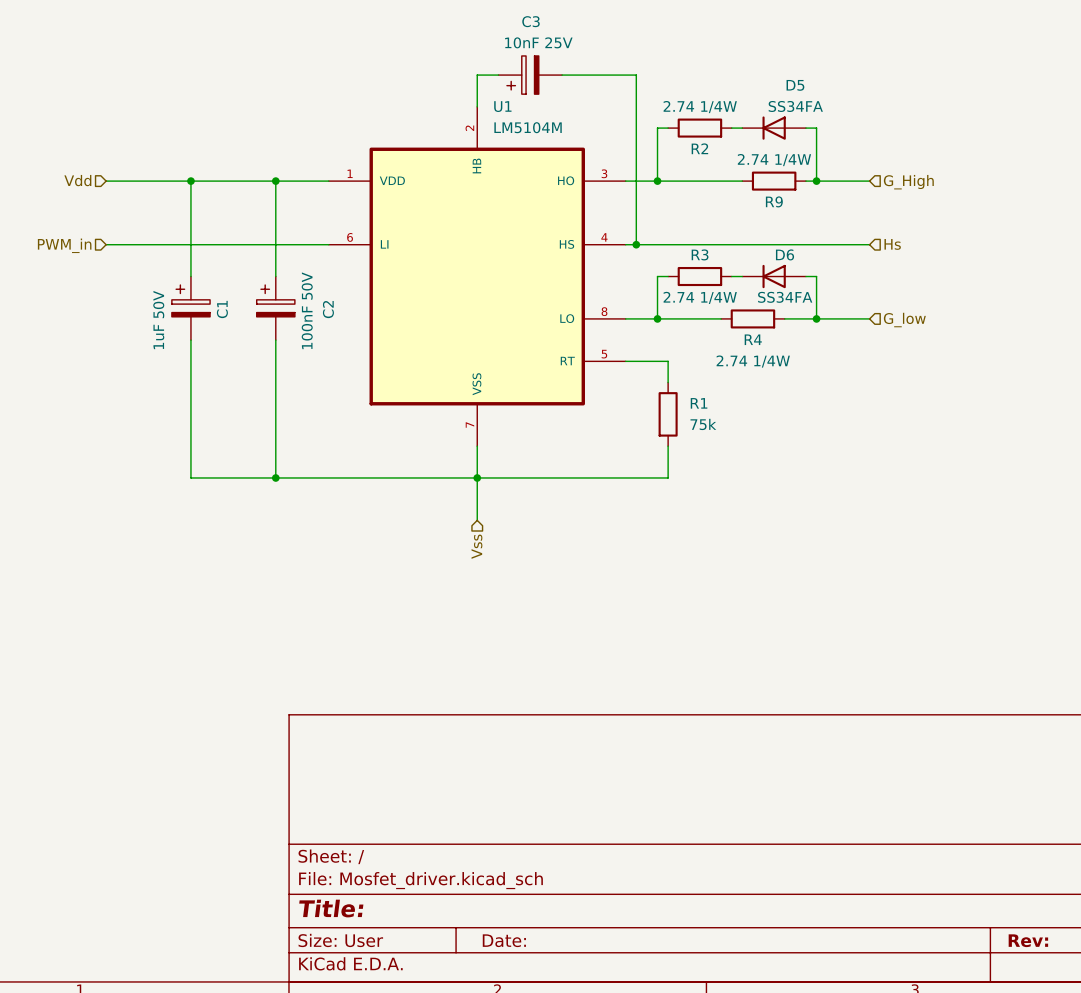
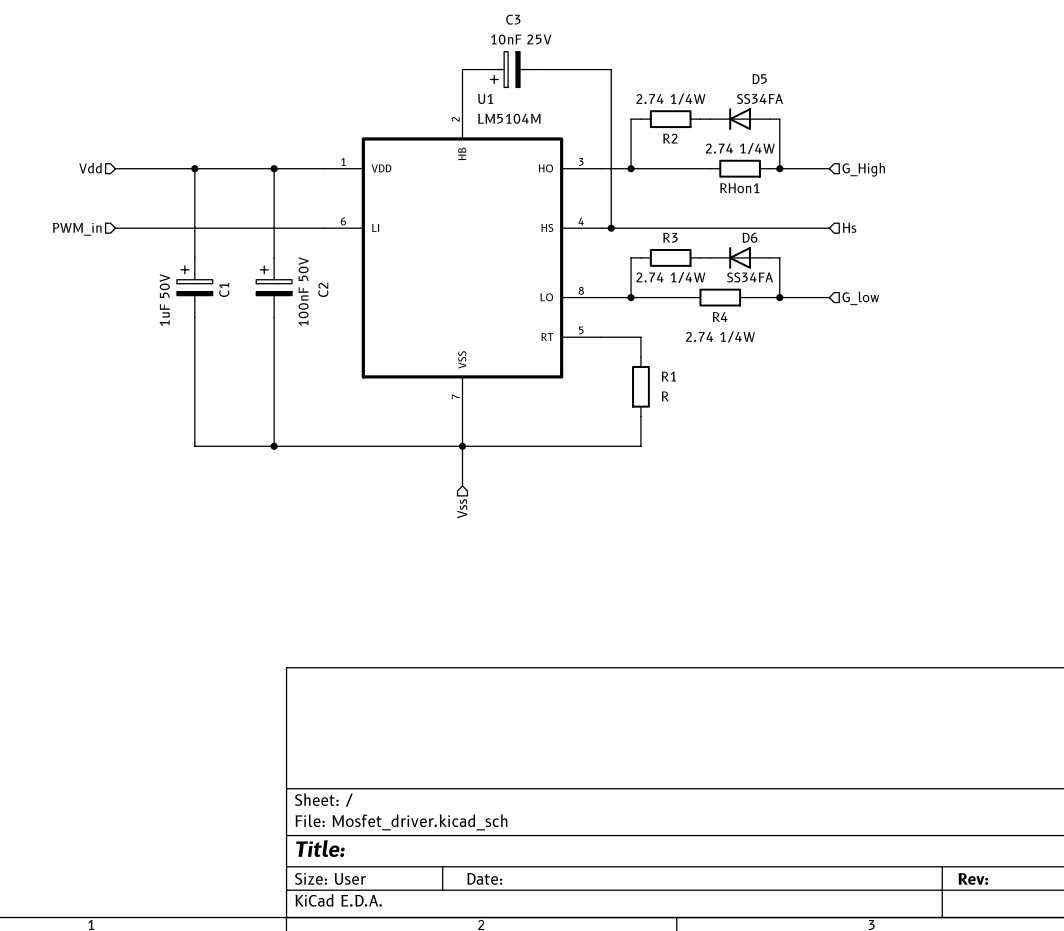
R9 name: R9 (774, 201) -> RHon1 (739, 188)
R1 value: 75k (703, 424) -> R (665, 396)

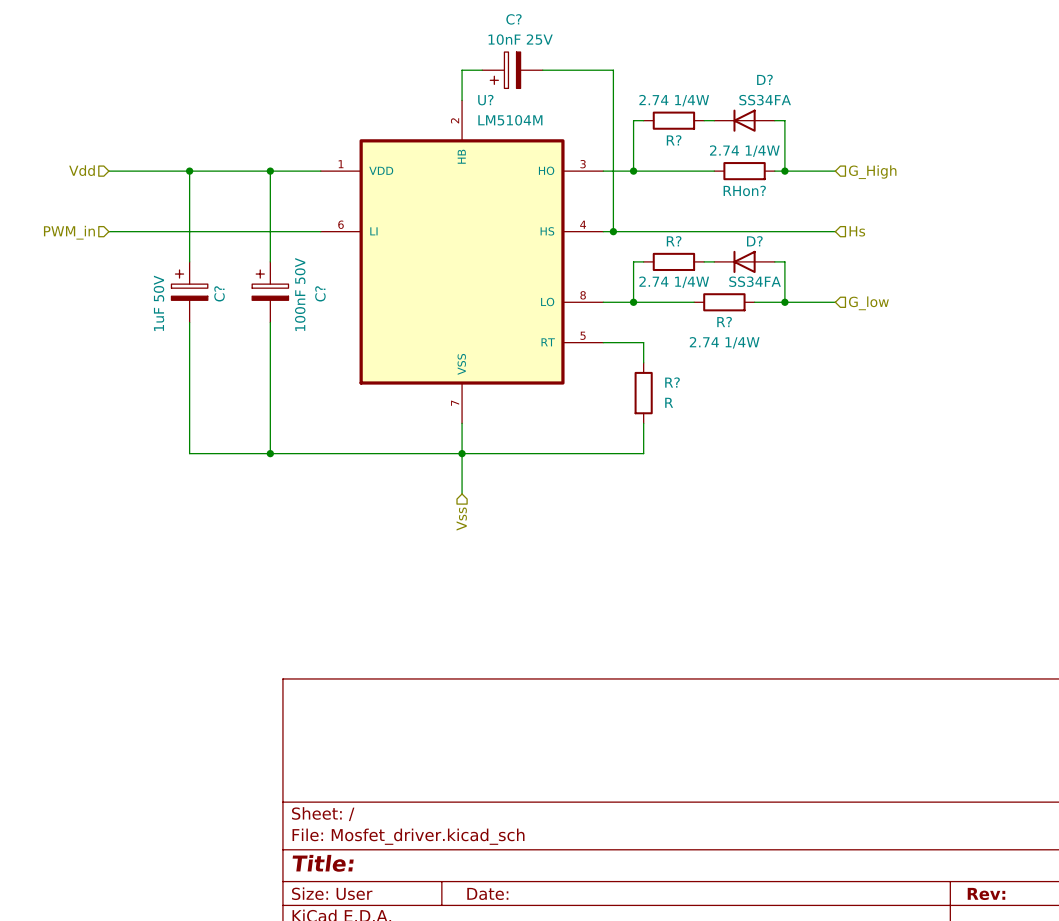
C3 name: C3 (513, 19) -> C? (513, 19)
D5 name: D5 (759, 79) -> D? (764, 79)
U1 name: U1 (485, 98) -> U? (485, 100)
R2 name: R2 (670, 138) -> R? (674, 140)
RHon1 name: RHon1 (739, 188) -> RHon? (744, 190)
R3 name: R3 (670, 237) -> R? (674, 241)
D6 name: D6 (750, 237) -> D? (754, 241)
C1 name: C1 (224, 289) -> C? (219, 293)
C2 name: C2 (323, 289) -> C? (320, 293)
R4 name: R4 (720, 317) -> R? (724, 321)
R1 name: R1 (668, 376) -> R? (672, 382)

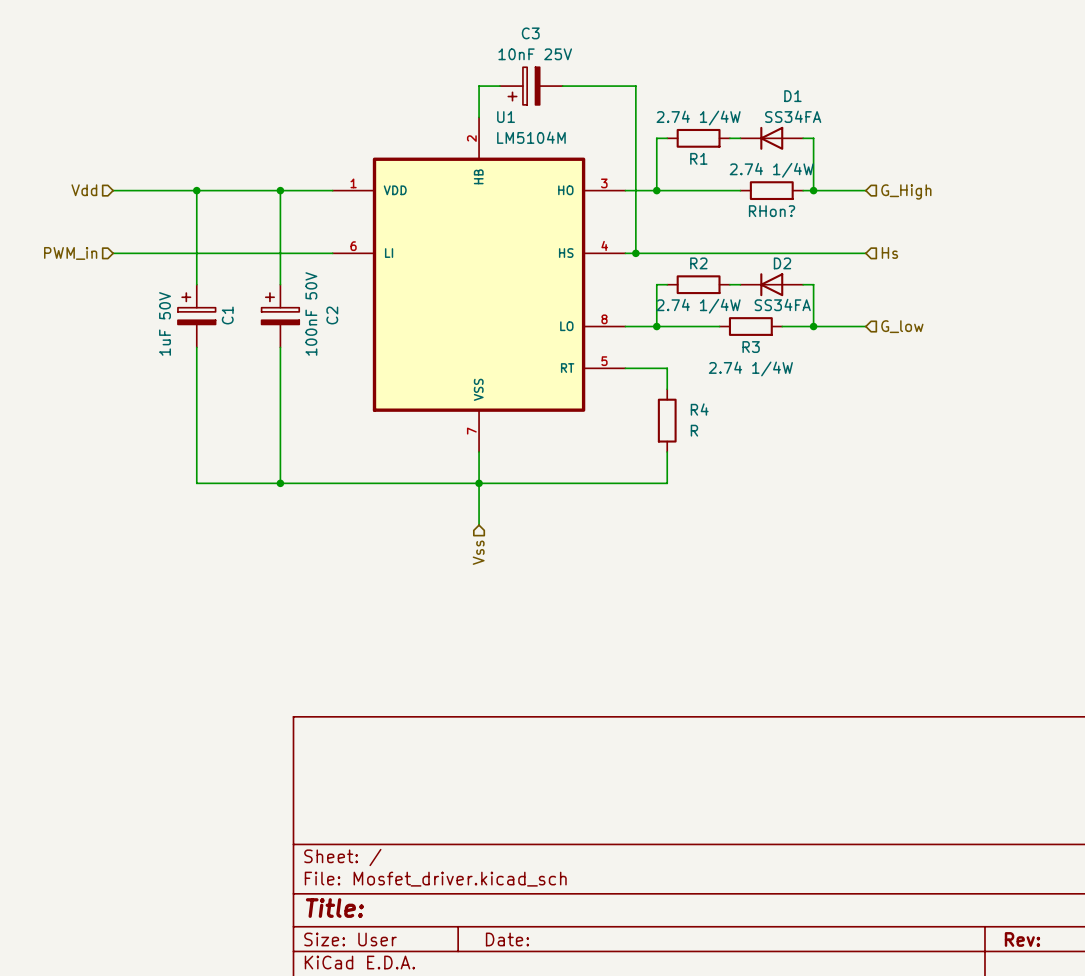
C? name: C? (513, 19) -> C3 (530, 33)
D? name: D? (764, 79) -> D1 (792, 96)
U? name: U? (485, 100) -> U1 (506, 117)
R? name: R? (674, 140) -> R1 (698, 158)
R? name: R? (674, 241) -> R2 (698, 263)
D? name: D? (754, 241) -> D2 (782, 263)
C? name: C? (219, 293) -> C1 (227, 315)
C? name: C? (320, 293) -> C2 (332, 315)
R? name: R? (724, 321) -> R3 (751, 347)
R? name: R? (672, 382) -> R4 (699, 409)

